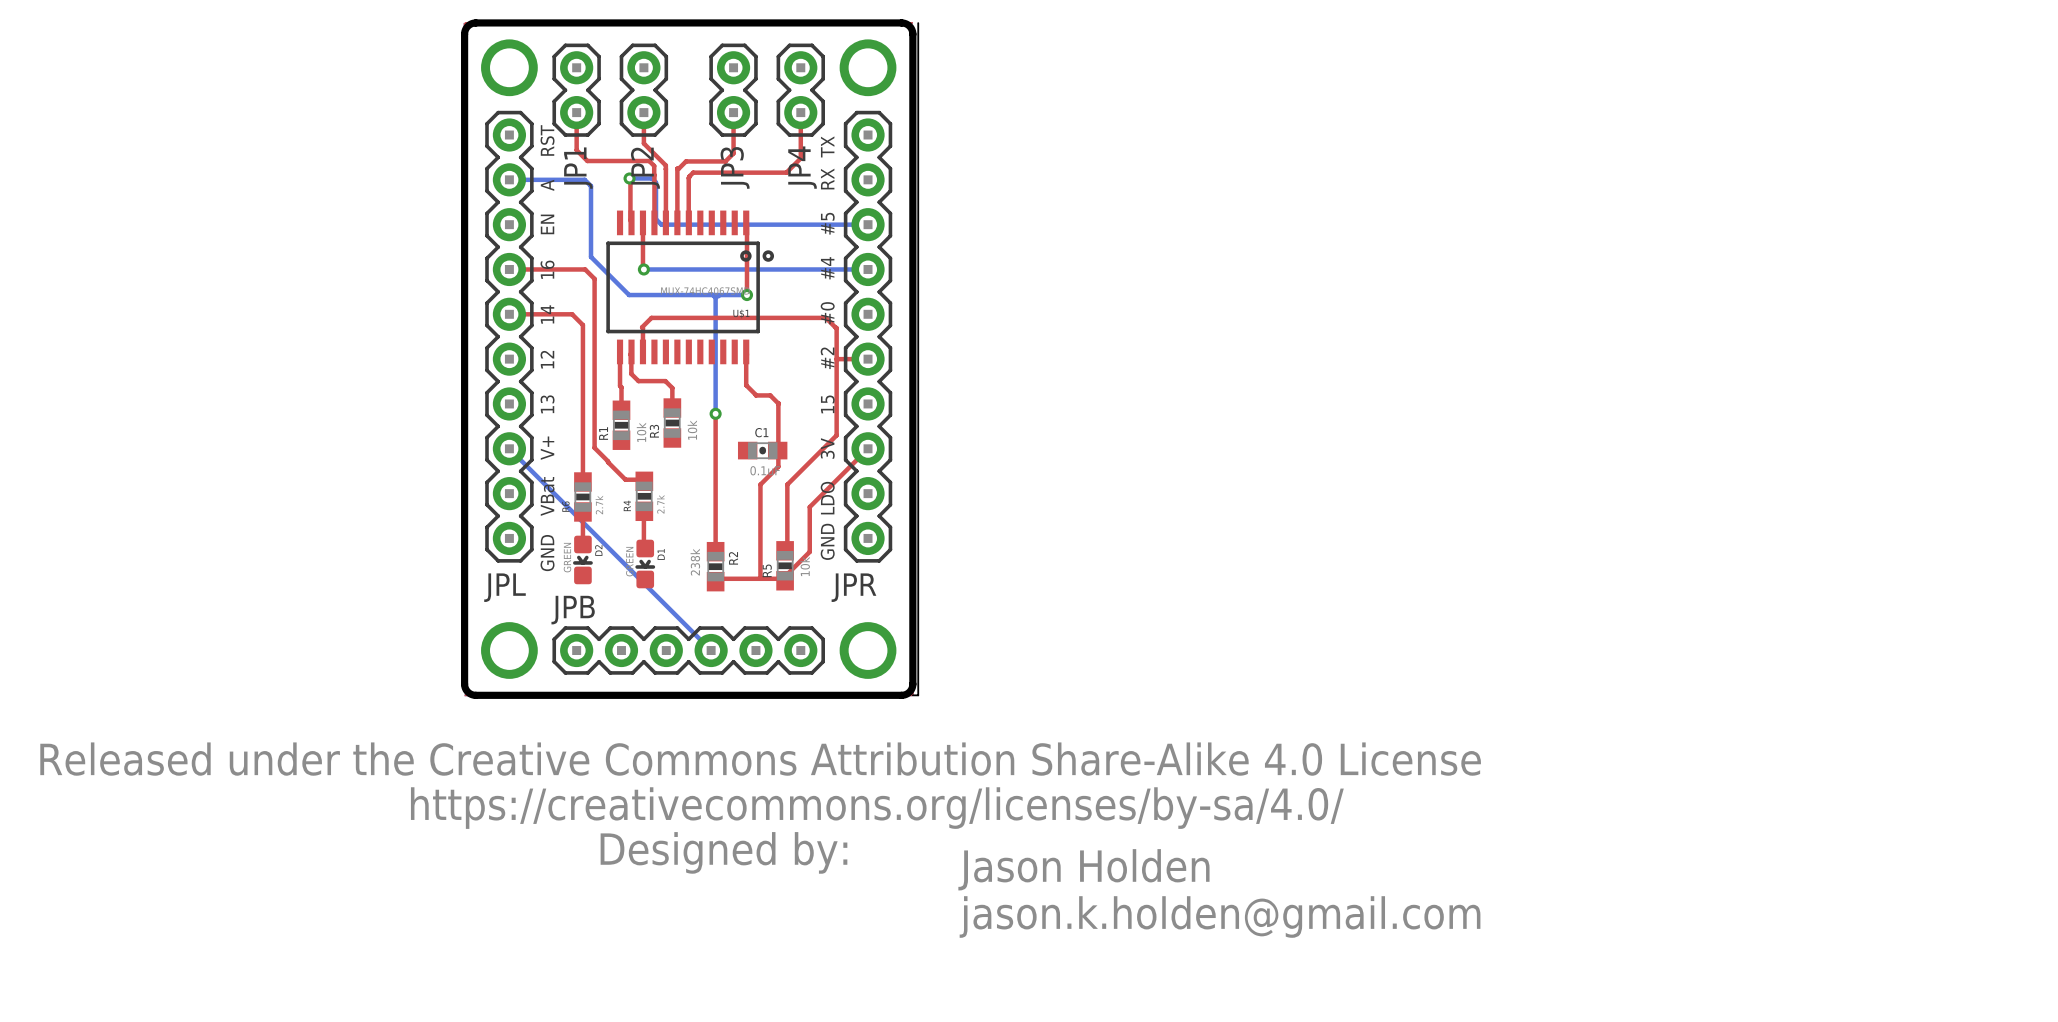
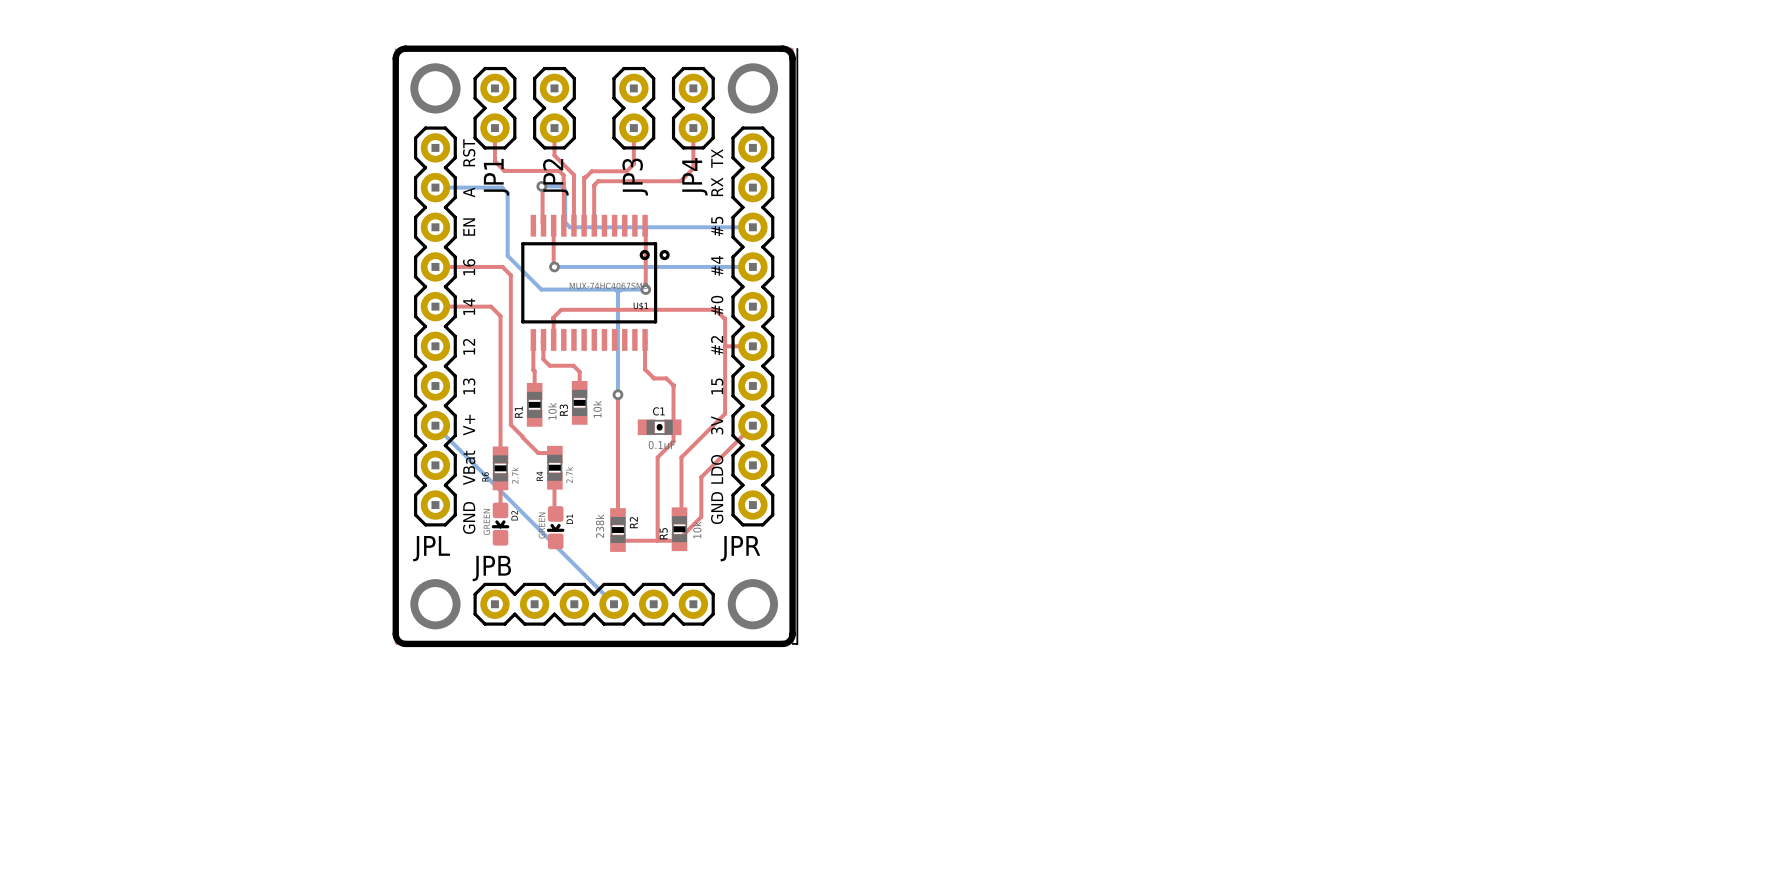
drawing: [40, 742, 1481, 874] -> none
text: Jason Holden (1083, 869) -> none
text: jason.k.holden@gmail.com (1220, 917) -> none

